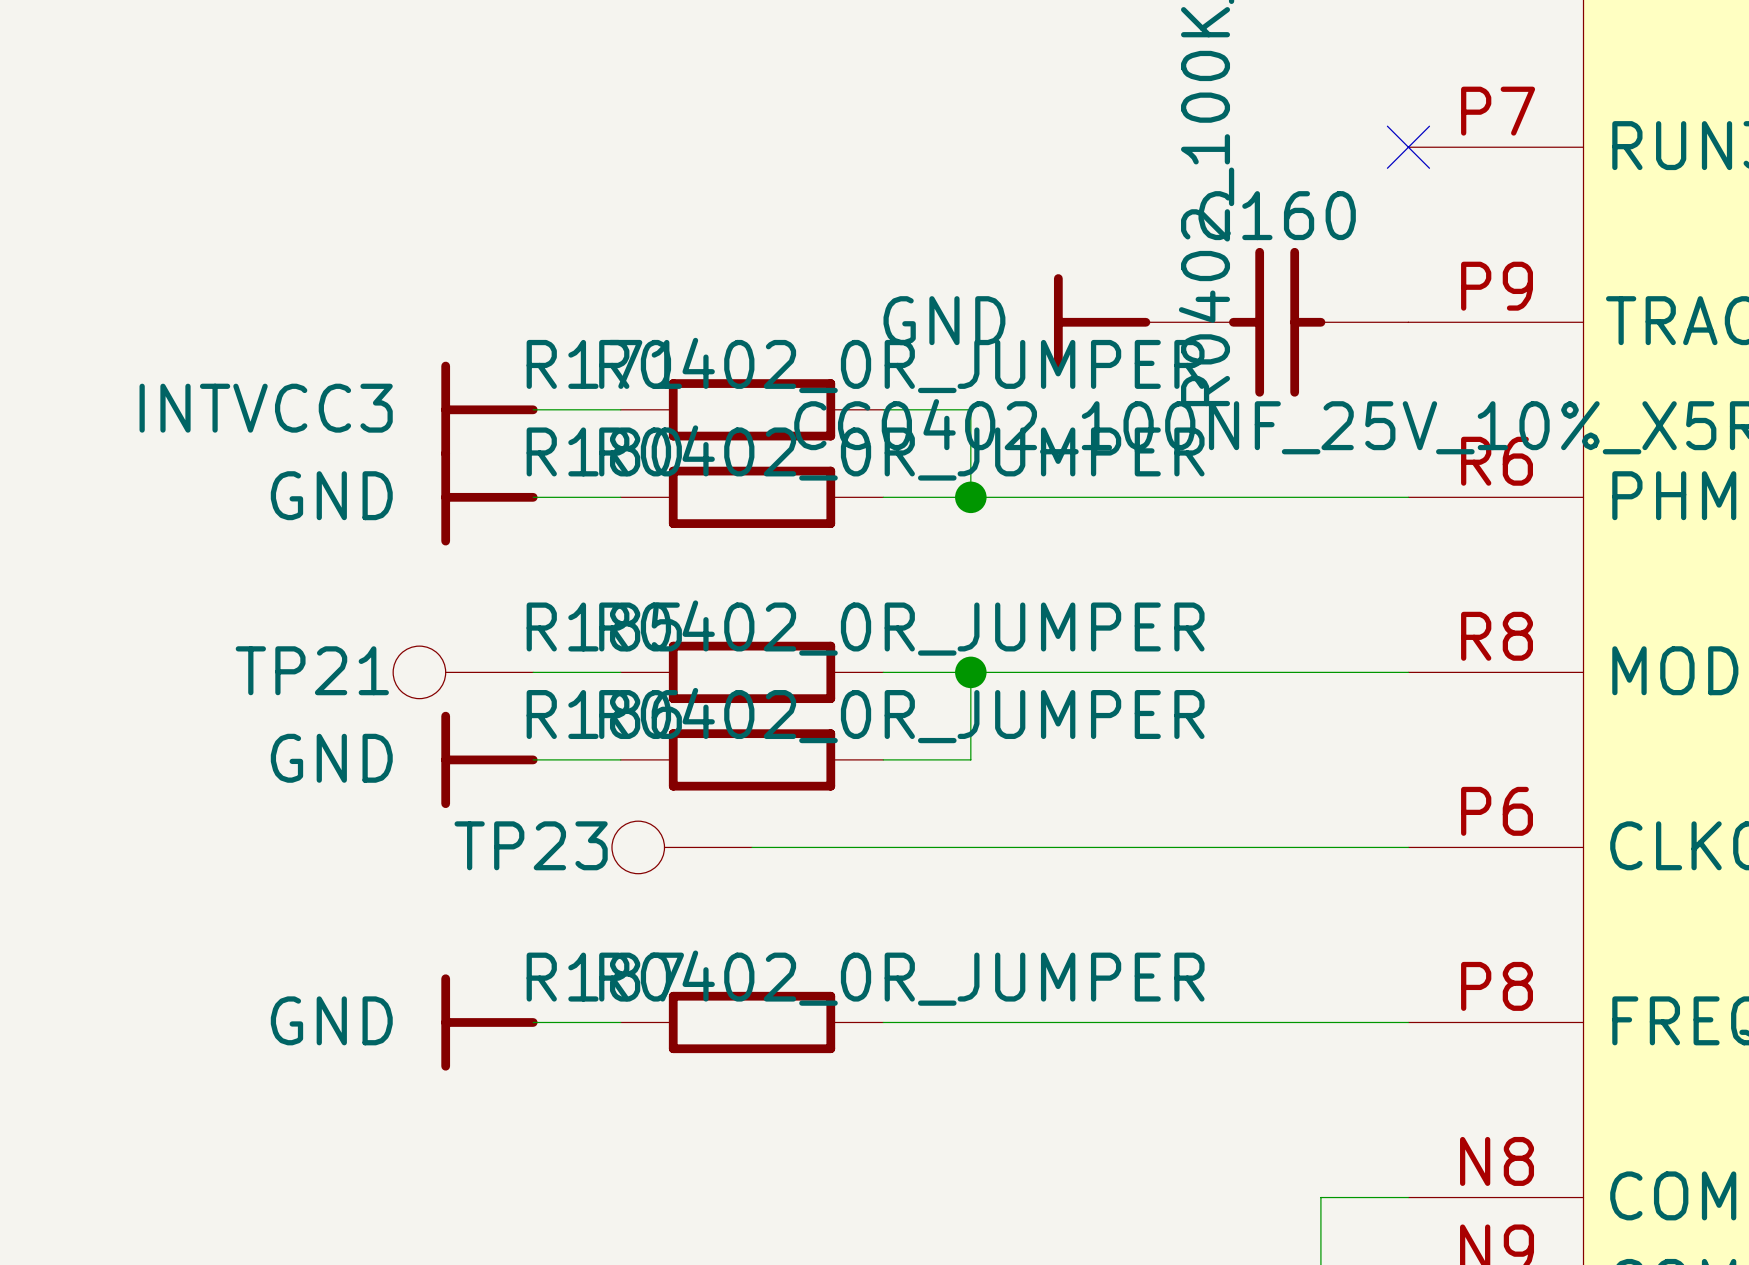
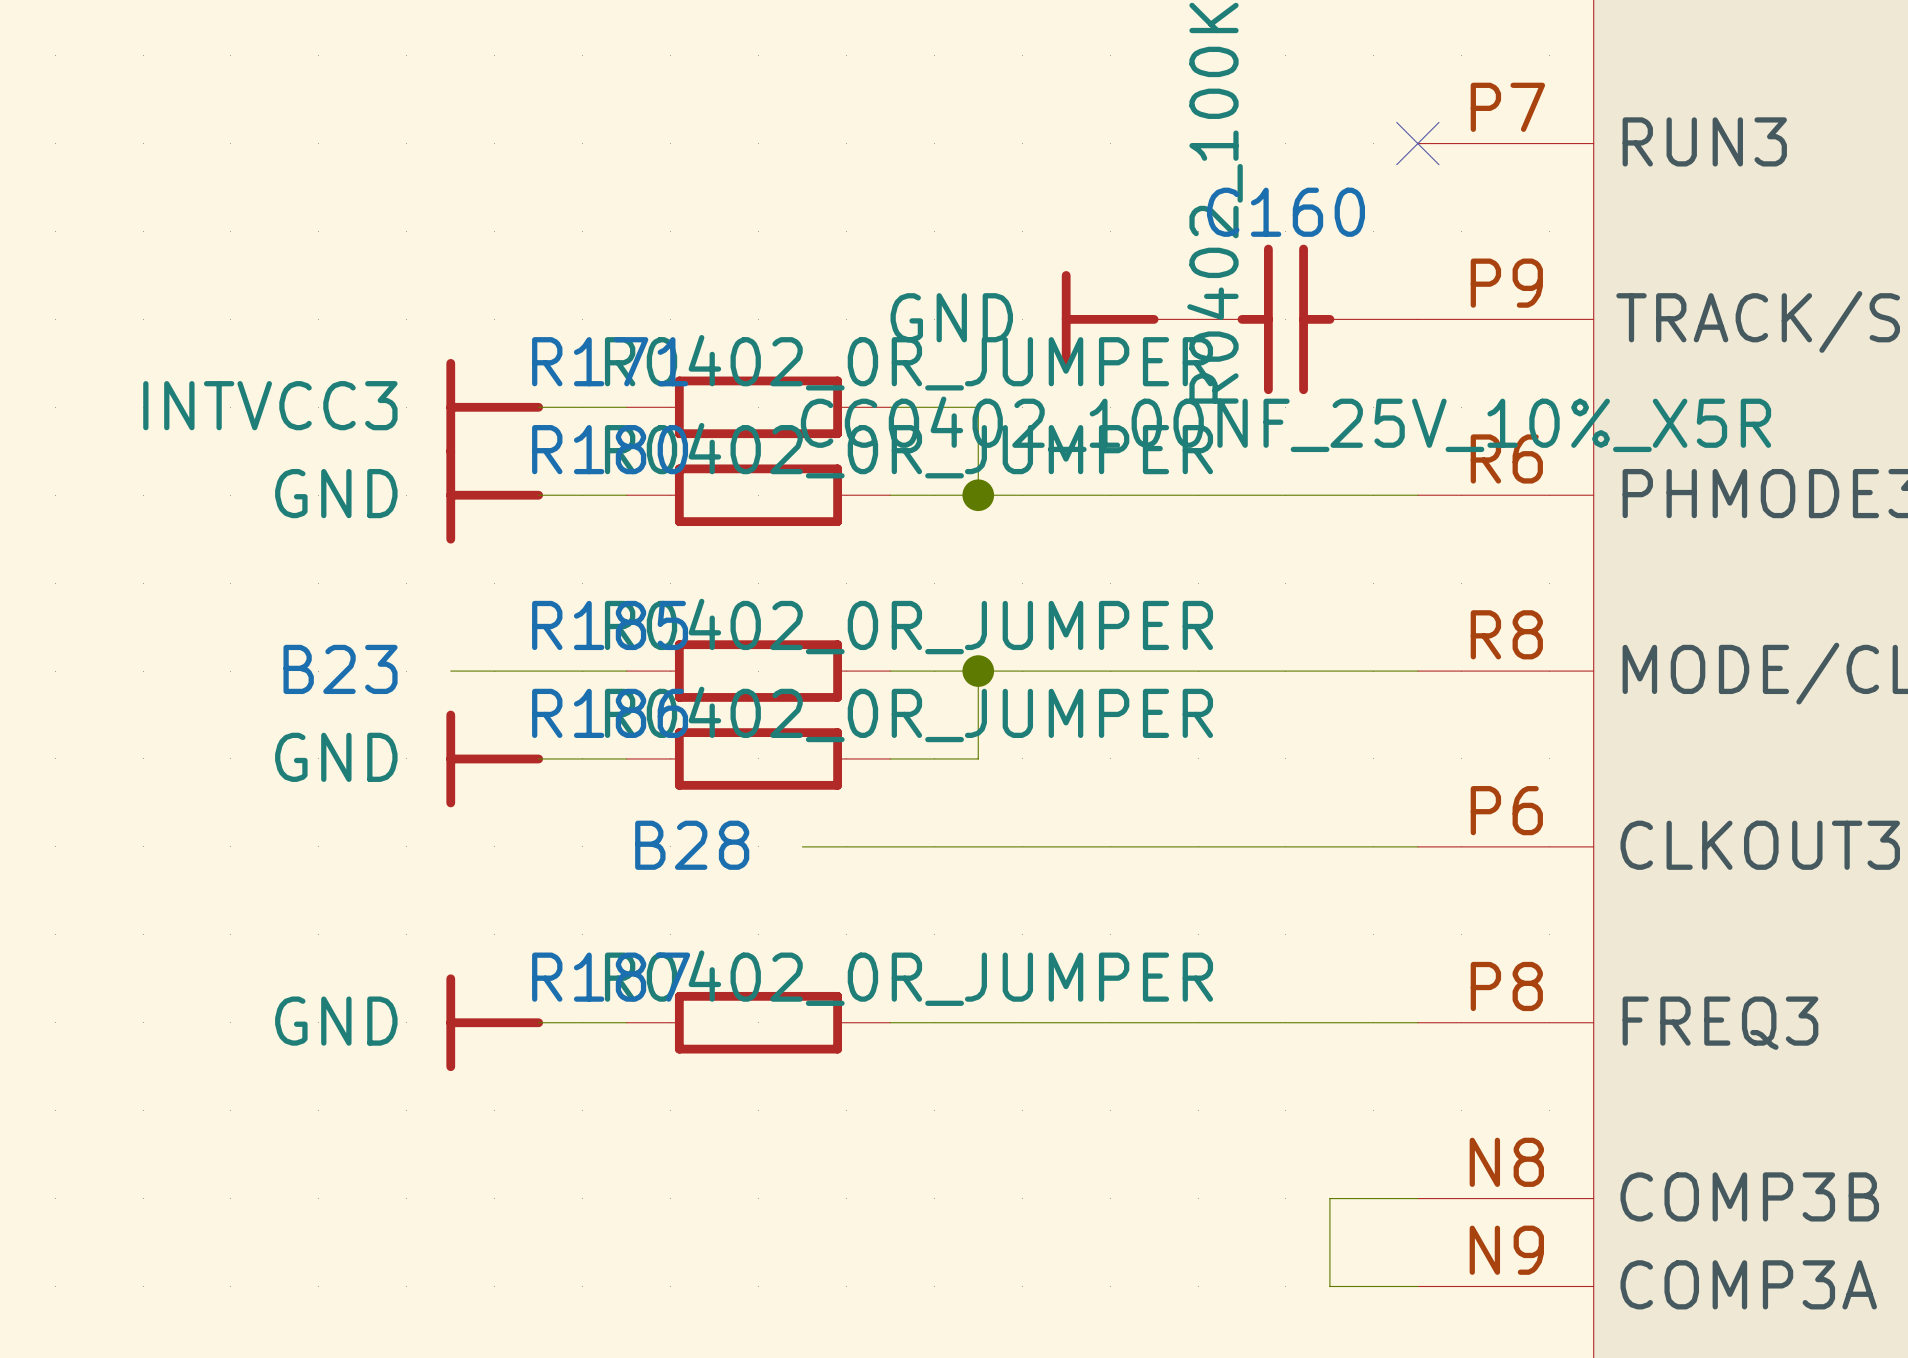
B23: none -> (340, 669)
TP21: (463, 672) -> none
B28: none -> (692, 845)
TP23: (682, 847) -> none
wire: (752, 847) (795, 847) -> none

